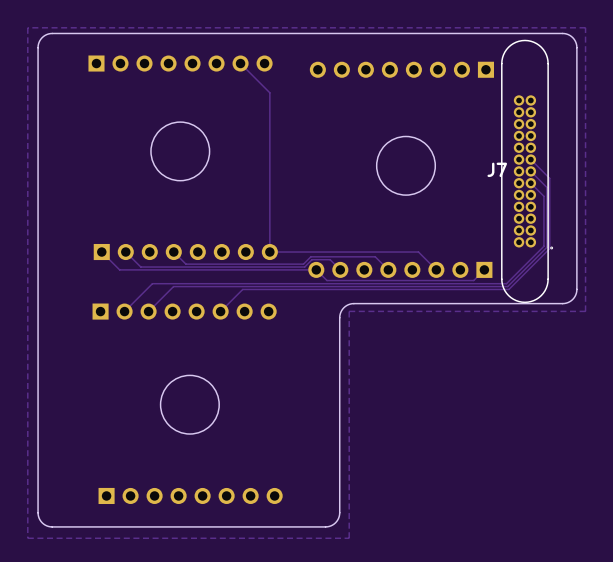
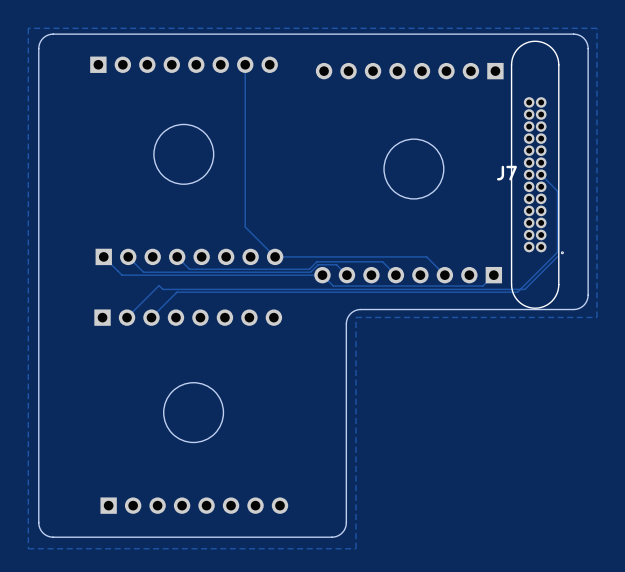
track: (240, 63) (269, 92) (269, 252) -> (245, 64) (245, 227) (275, 256)
track: (530, 159) (549, 178) (549, 248) (508, 289) (242, 289) (220, 311) -> none
track: (530, 183) (543, 196) (543, 246) (506, 283) (152, 283) -> (558, 256) (524, 289) (162, 289) (159, 285) (155, 289)

